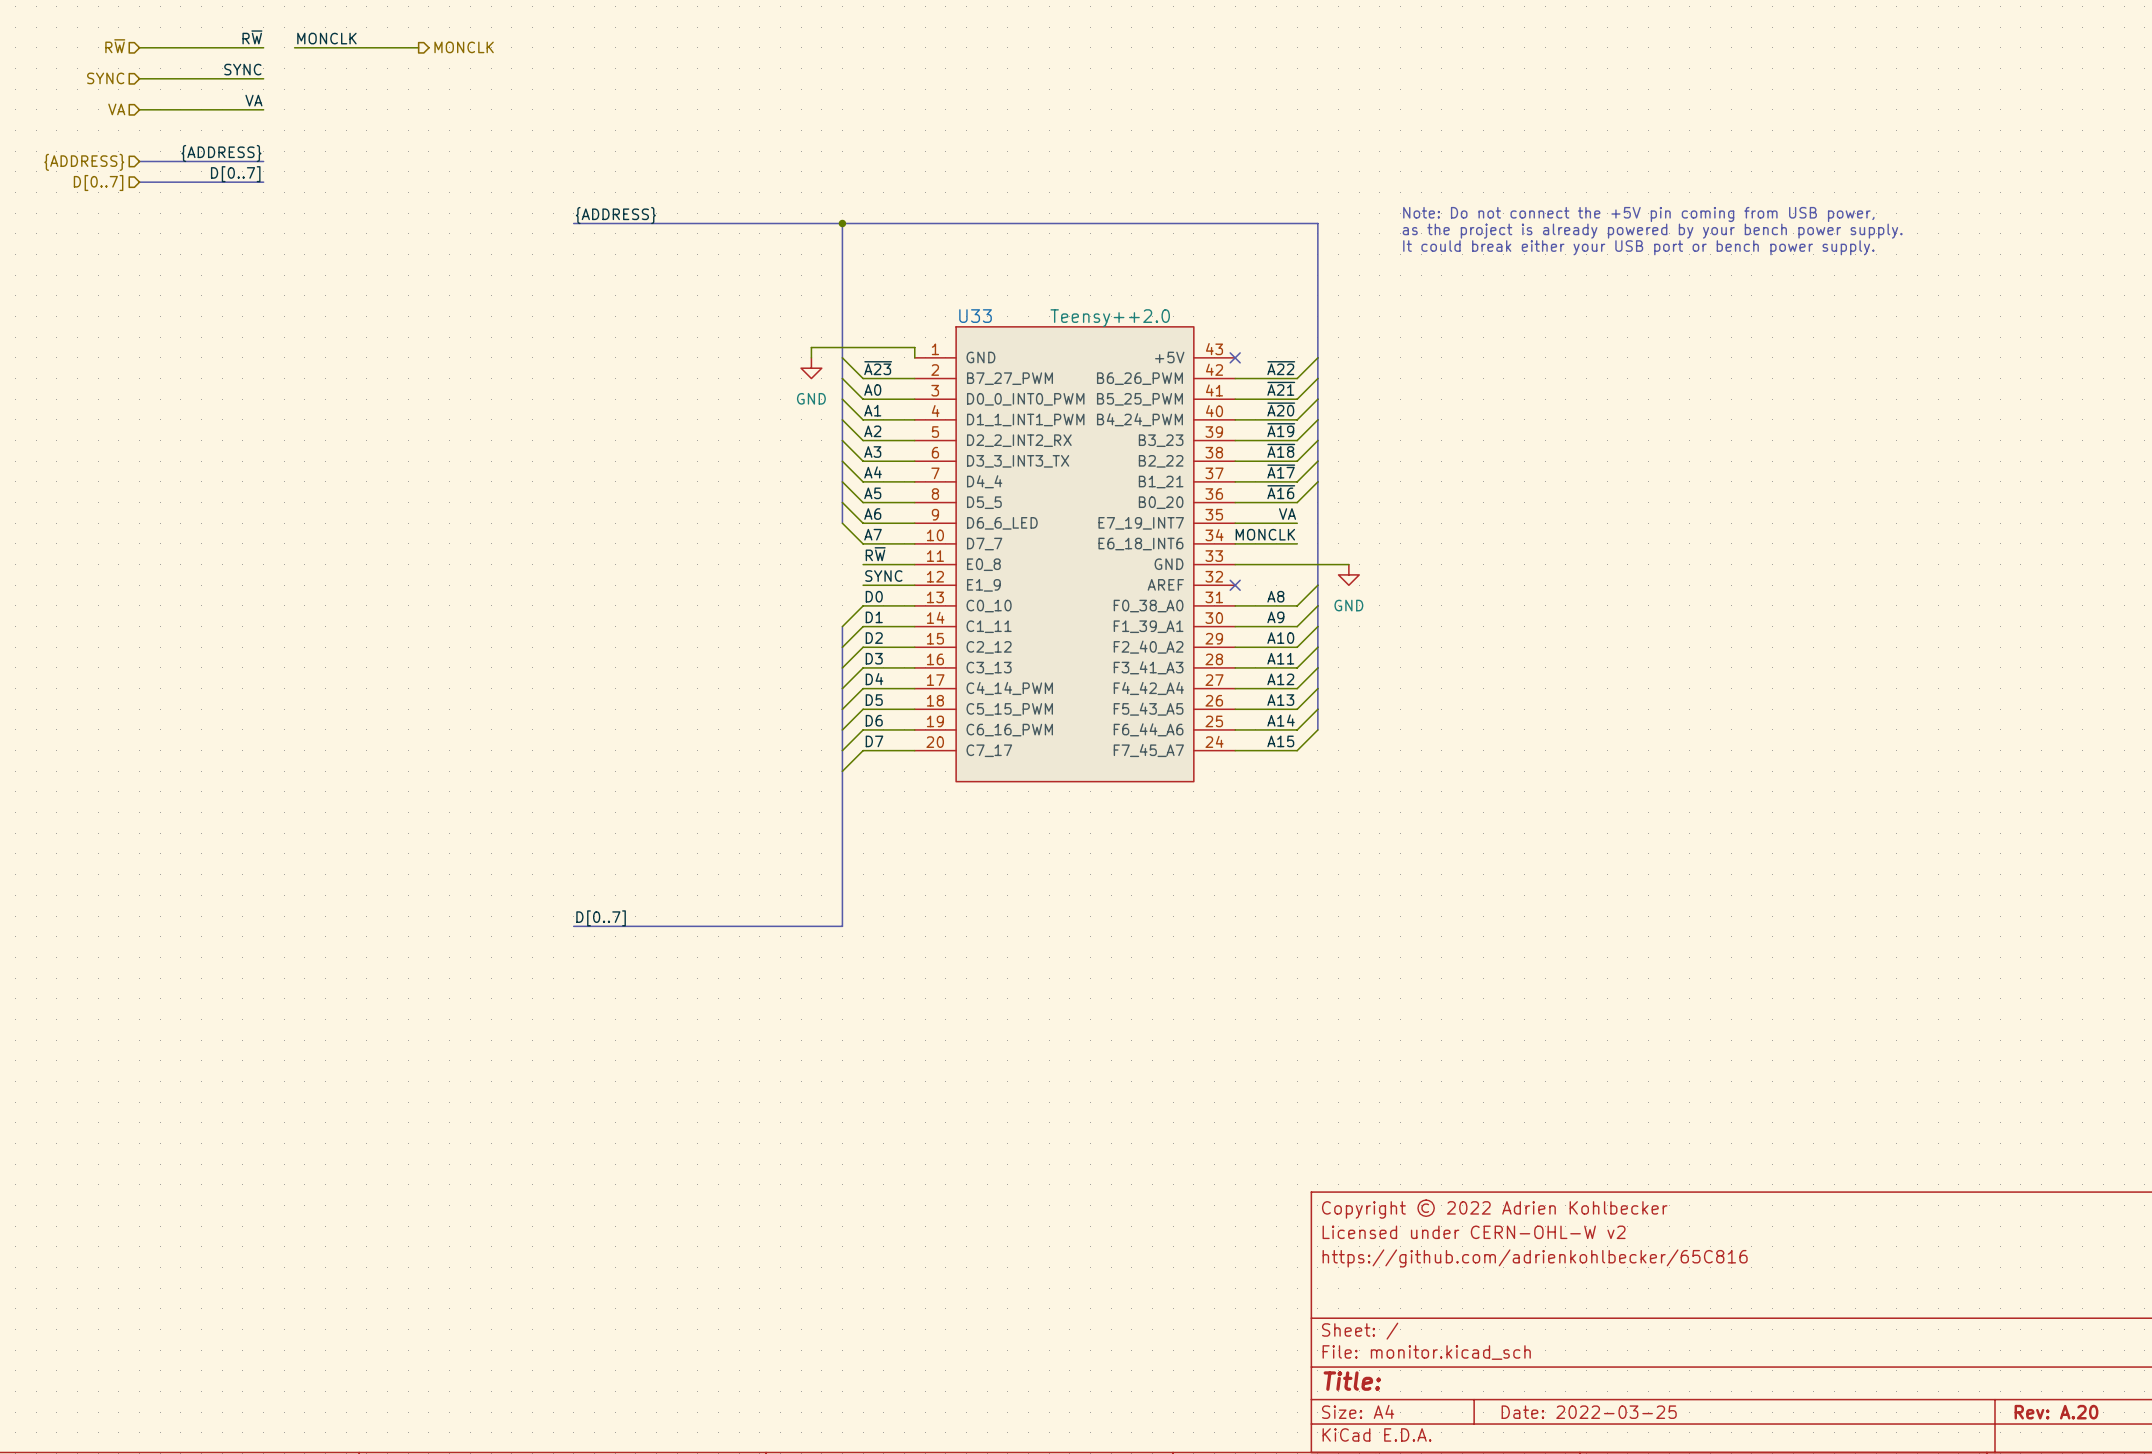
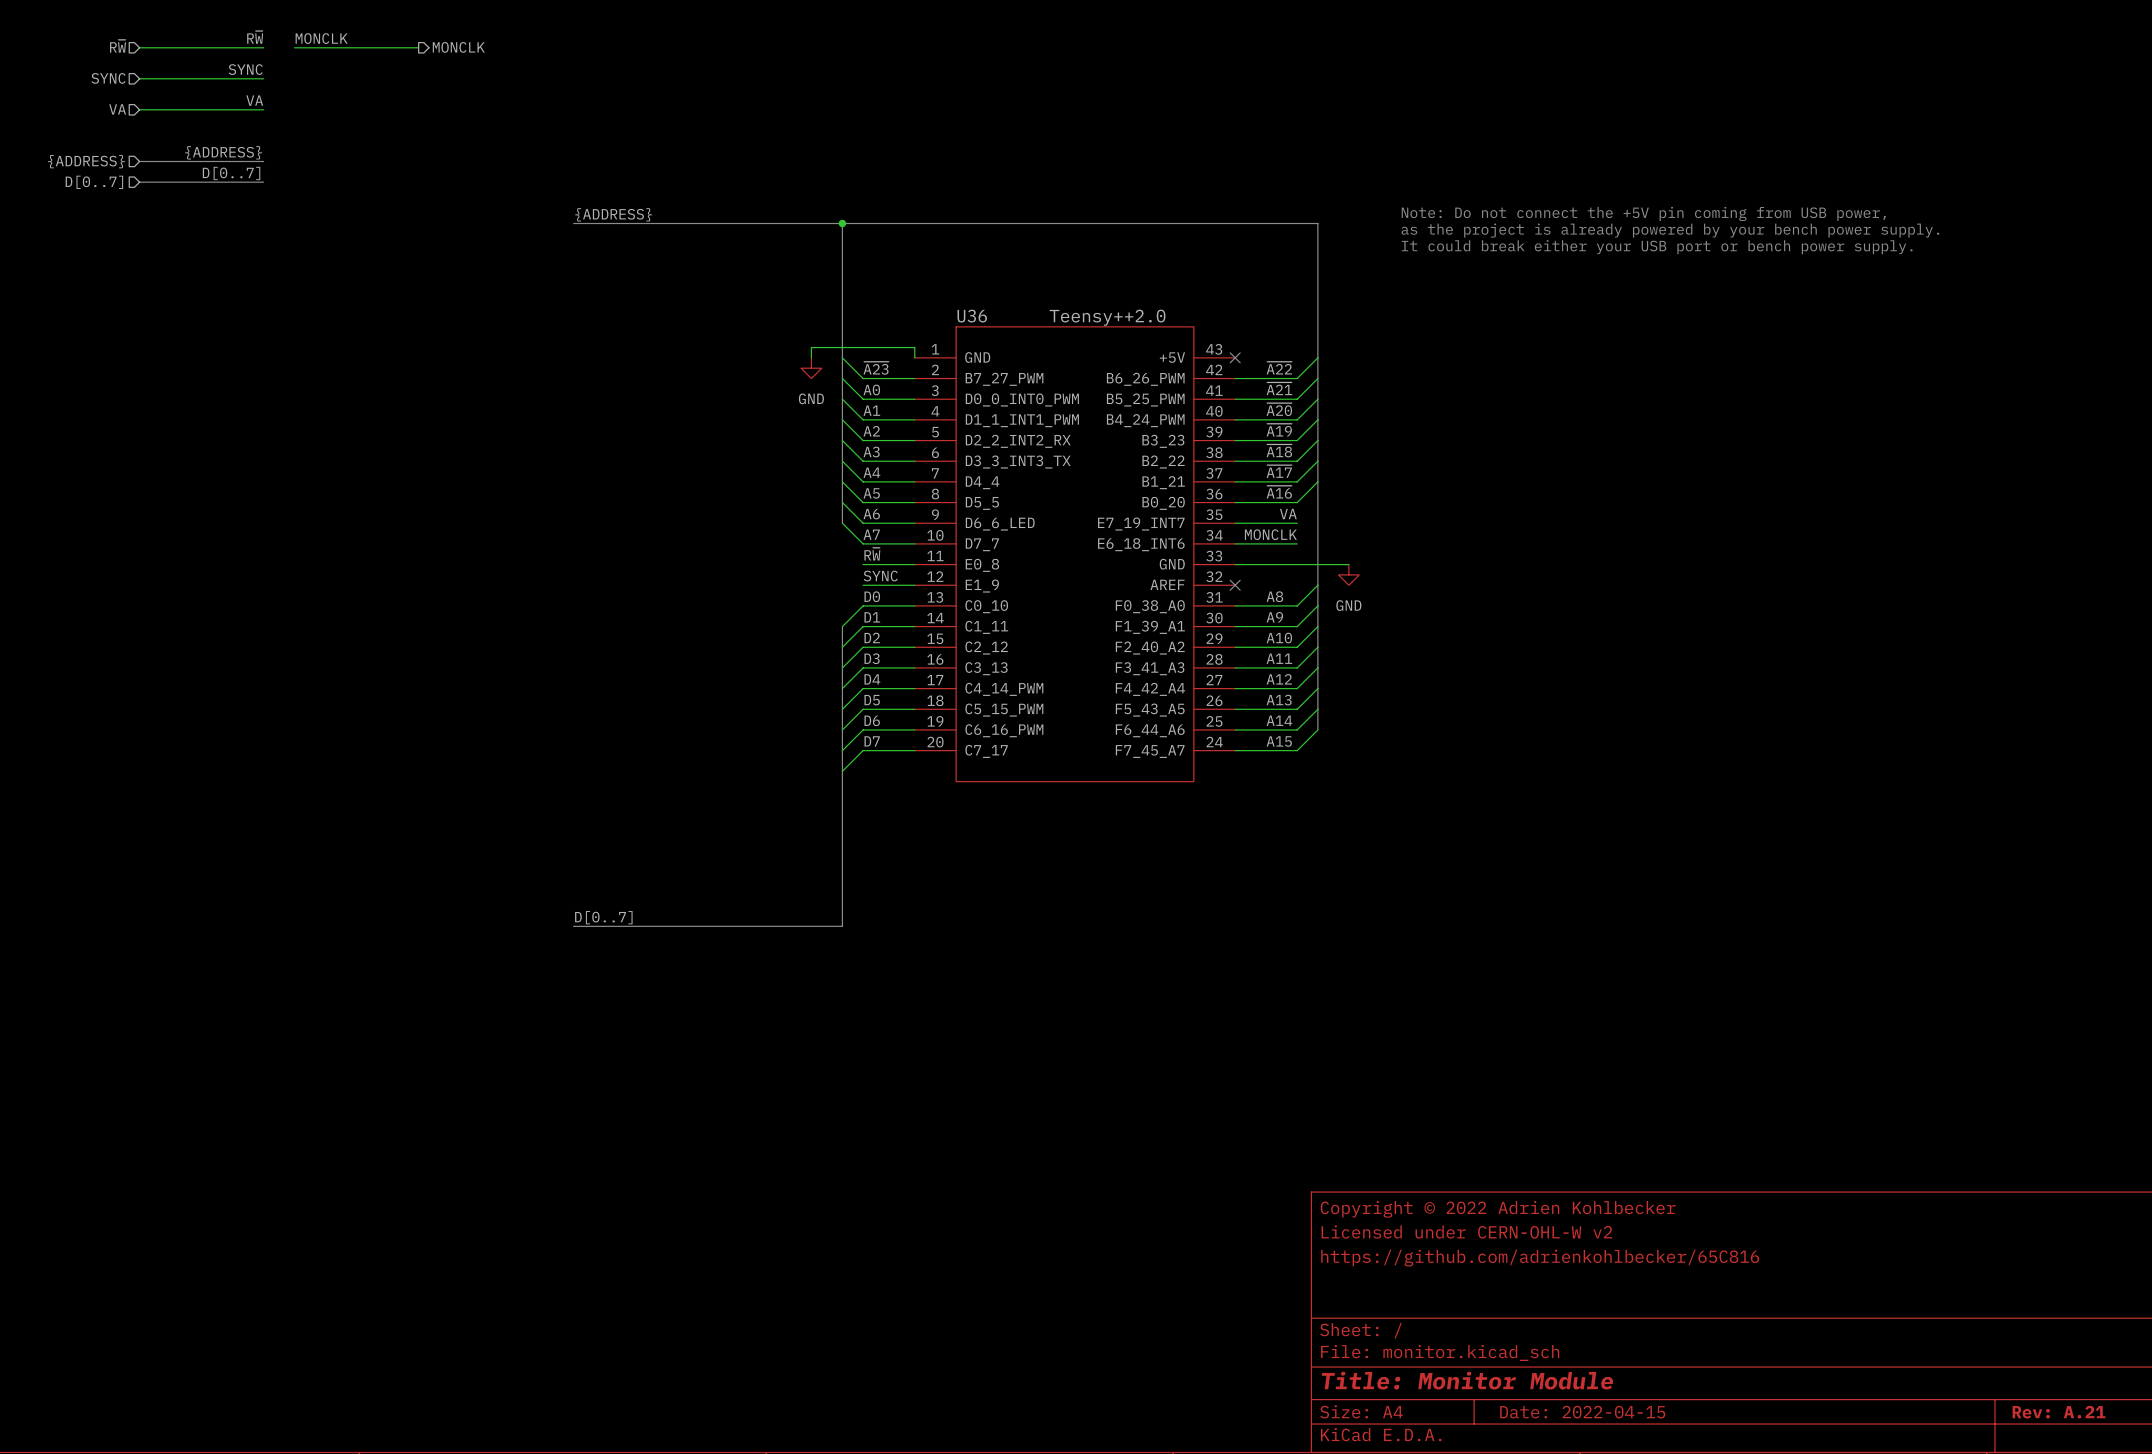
U33 name: U33 (975, 316) -> U36 (972, 316)
title block: Title: (1352, 1381) -> Title: Monitor Module (1467, 1380)
title block: Date: 2022-03-25 (1589, 1412) -> Date: 2022-04-15 (1582, 1412)
title block: Rev: A.20 (2056, 1412) -> Rev: A.21 (2058, 1412)

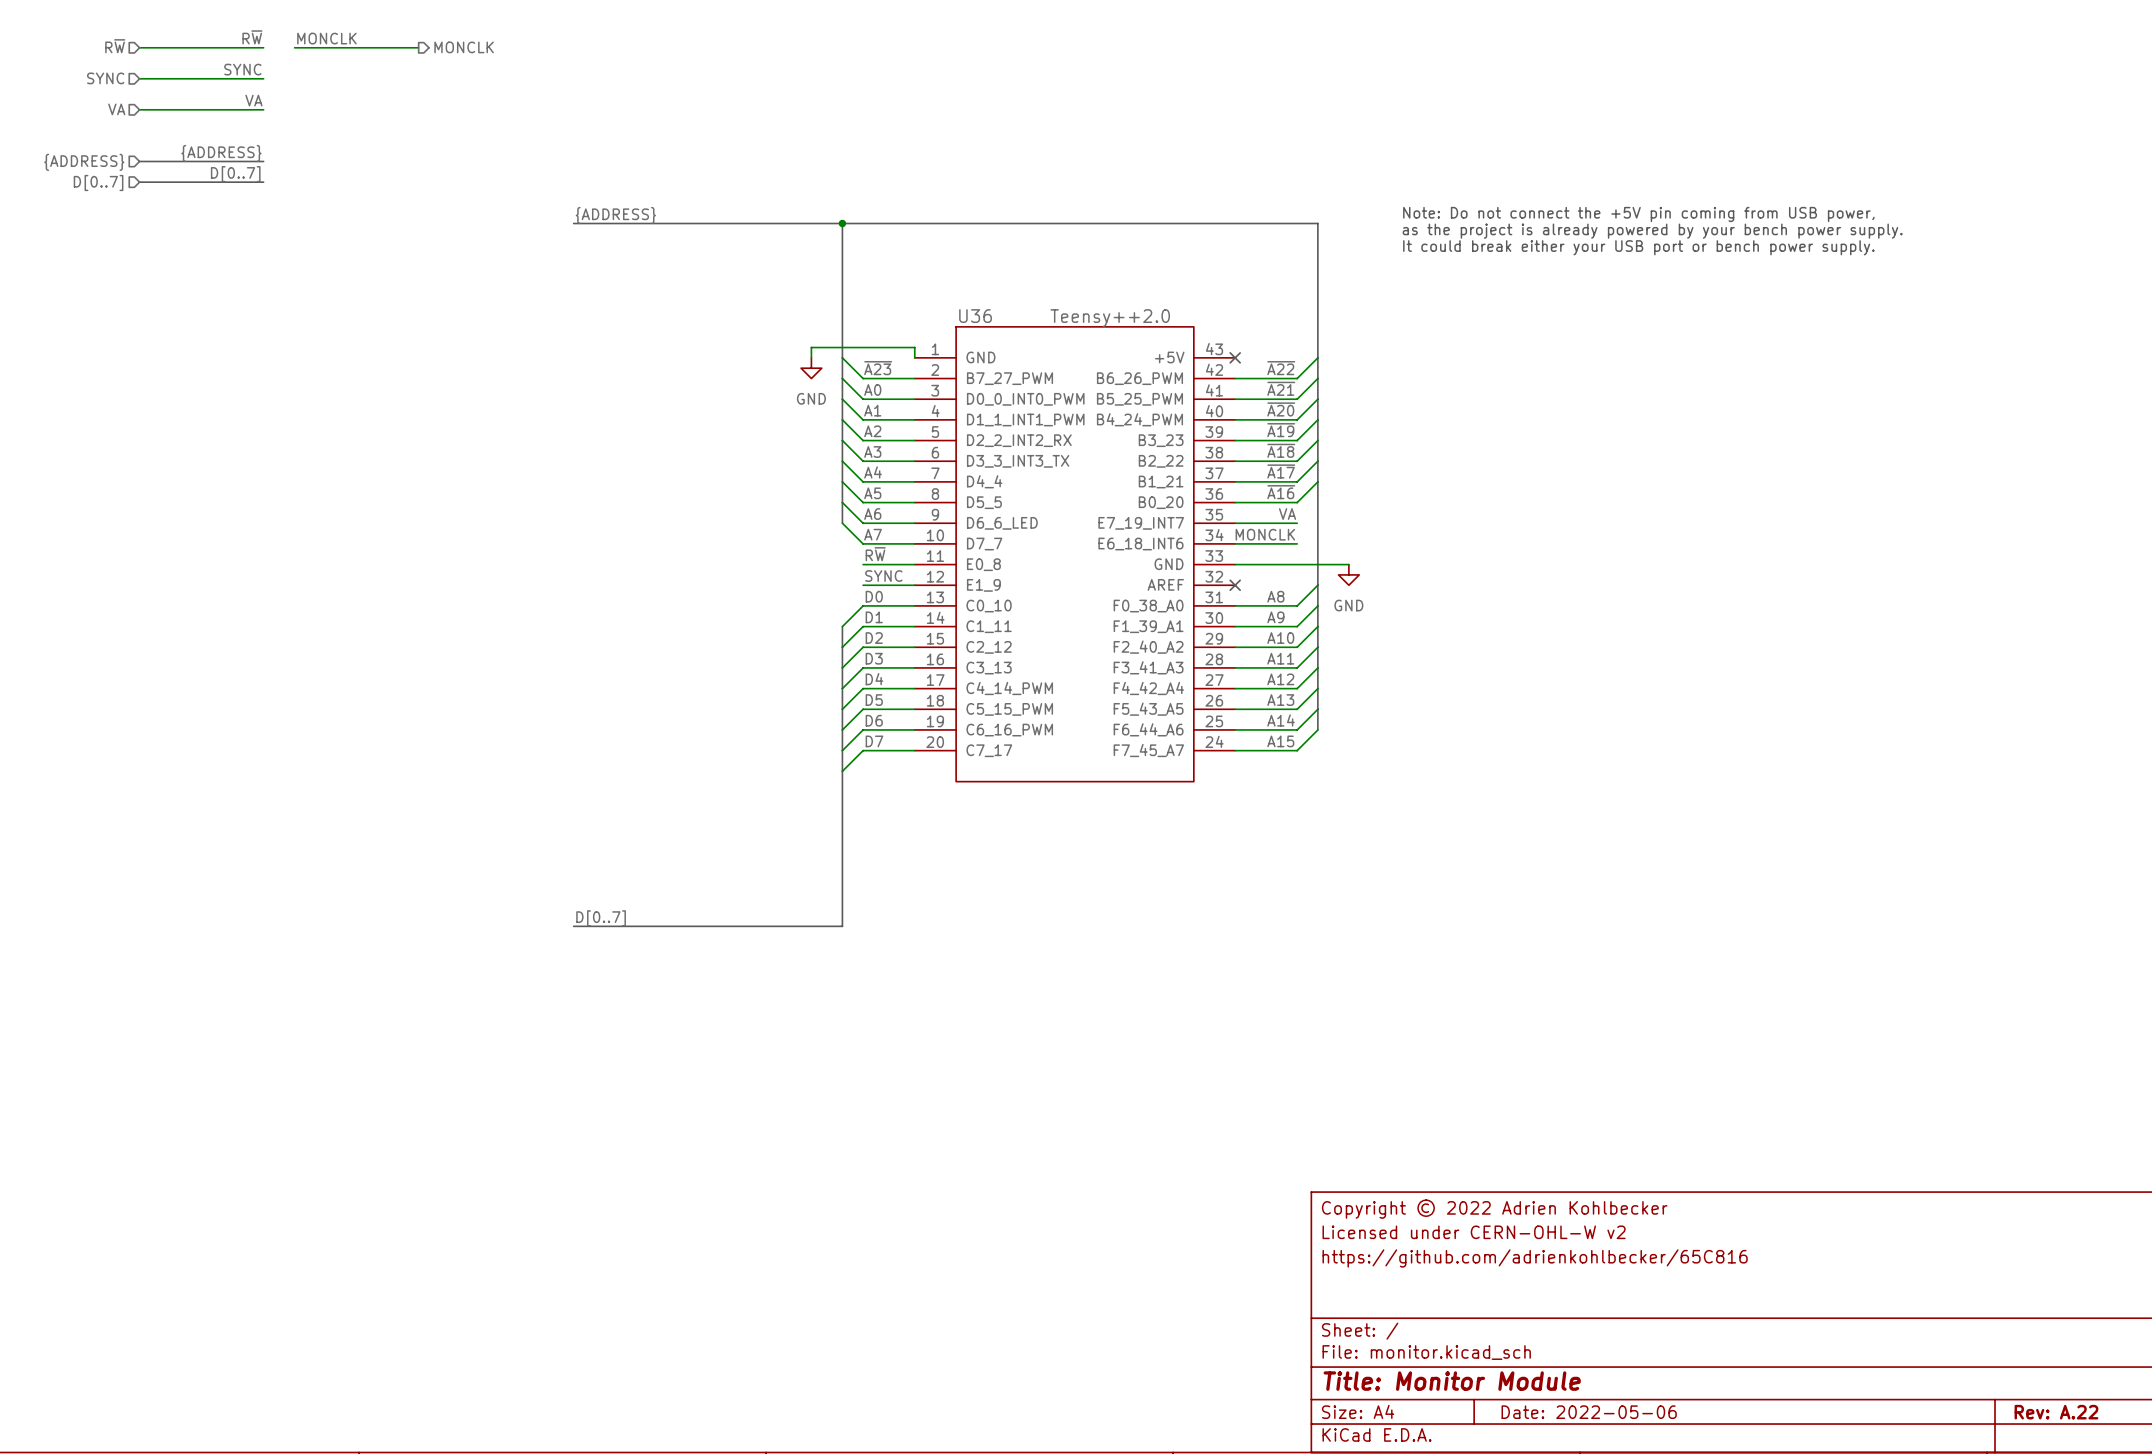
title block: Date: 2022-04-15 (1582, 1412) -> Date: 2022-05-06 (1589, 1412)
title block: Rev: A.21 (2058, 1412) -> Rev: A.22 (2056, 1412)

